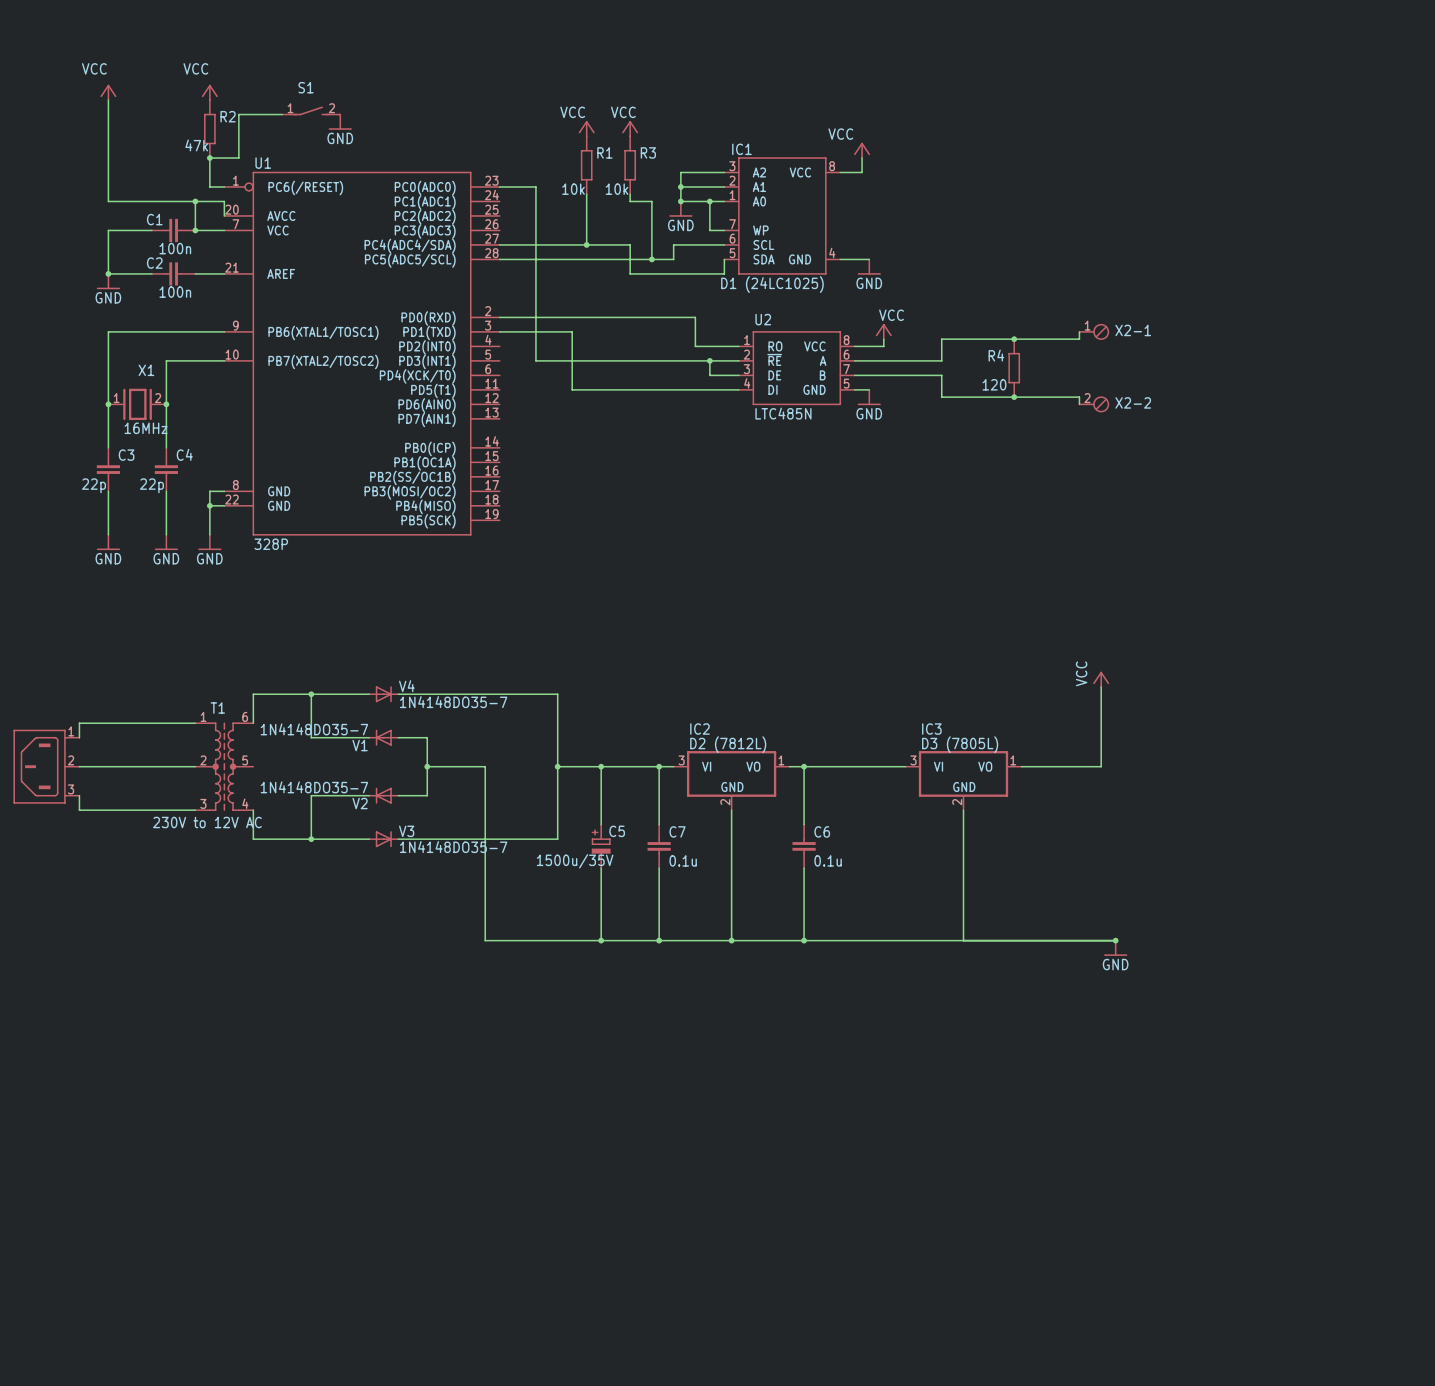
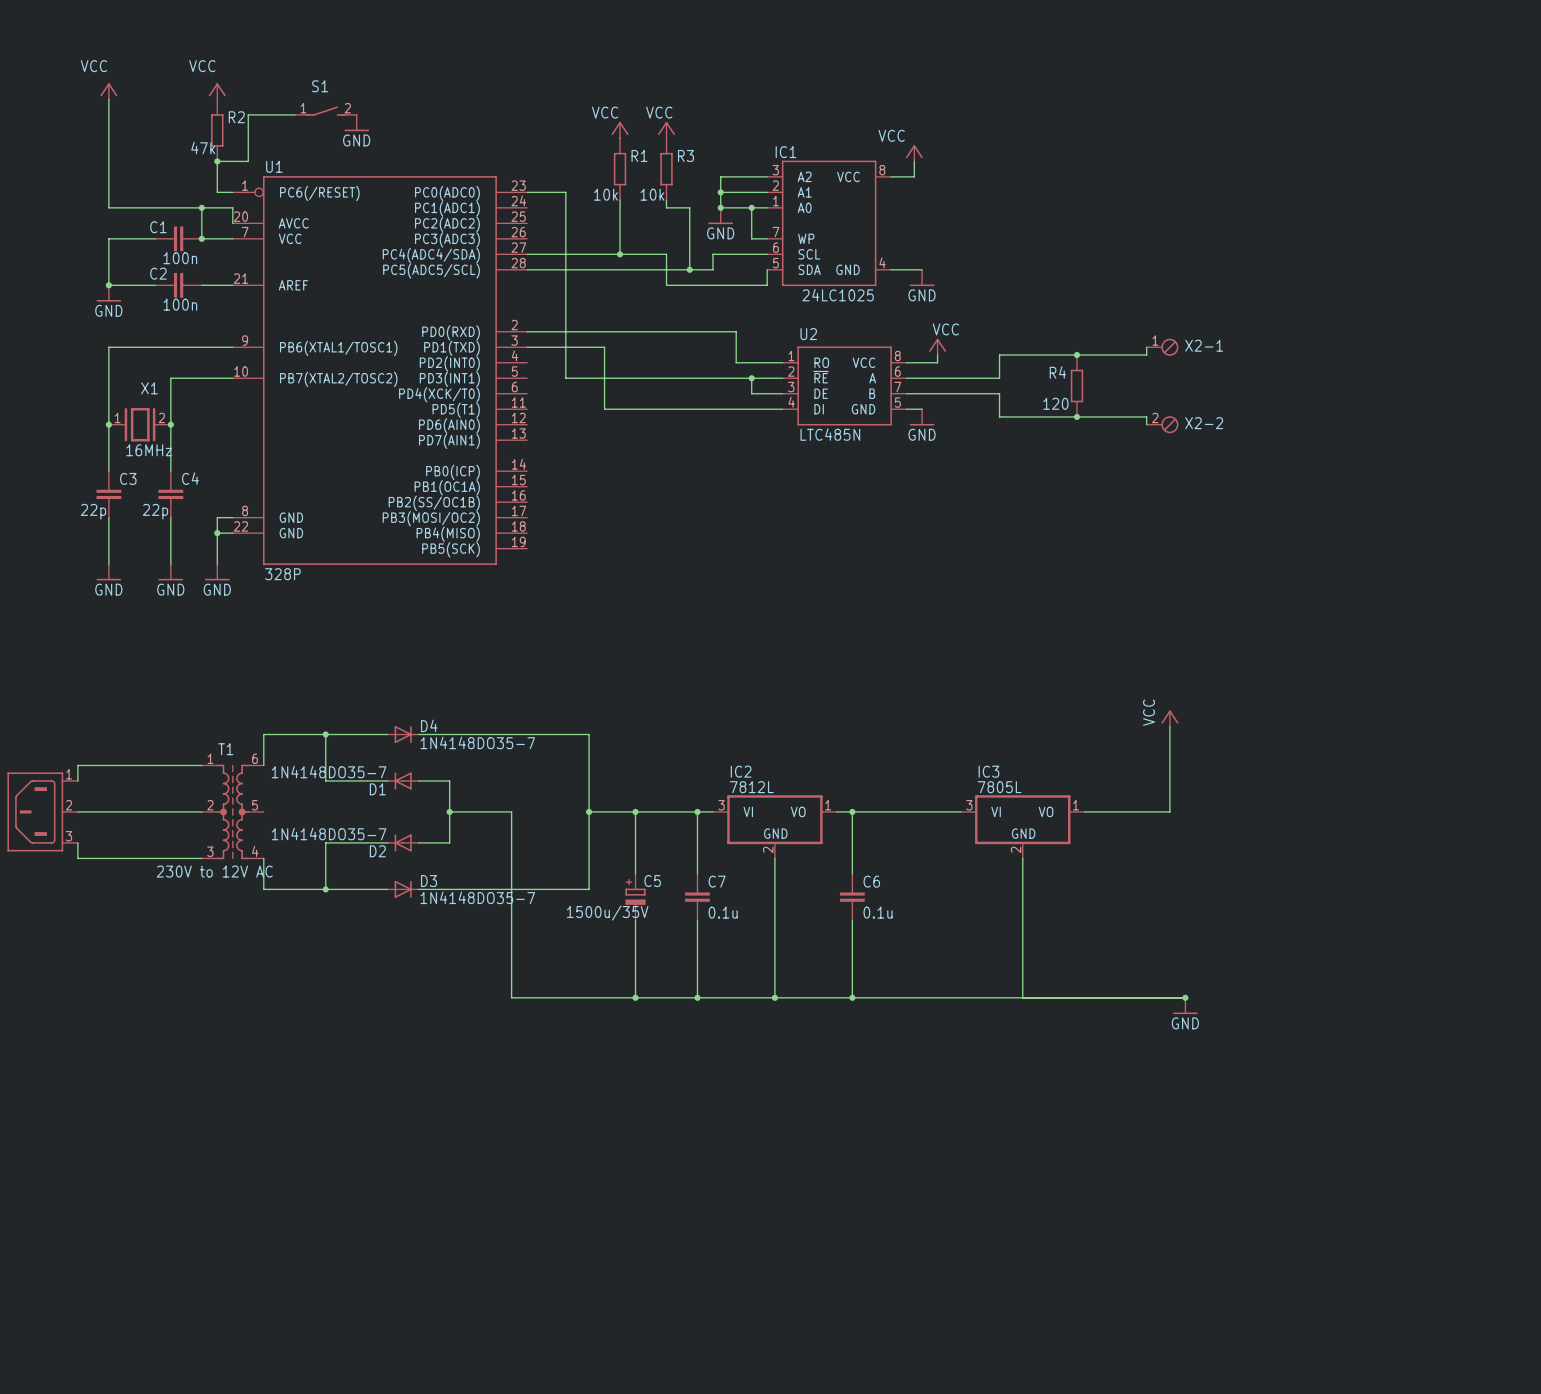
IC1 value: D1 (24LC1025) (772, 284) -> 24LC1025 (838, 295)
V4 name: V4 (406, 686) -> D4 (429, 725)
IC2 value: D2 (7812L) (728, 744) -> 7812L (751, 787)
IC3 value: D3 (7805L) (960, 744) -> 7805L (999, 787)
V1 name: V1 (360, 745) -> D1 (377, 789)
V2 name: V2 (360, 803) -> D2 (377, 851)
V3 name: V3 (406, 831) -> D3 (429, 881)

